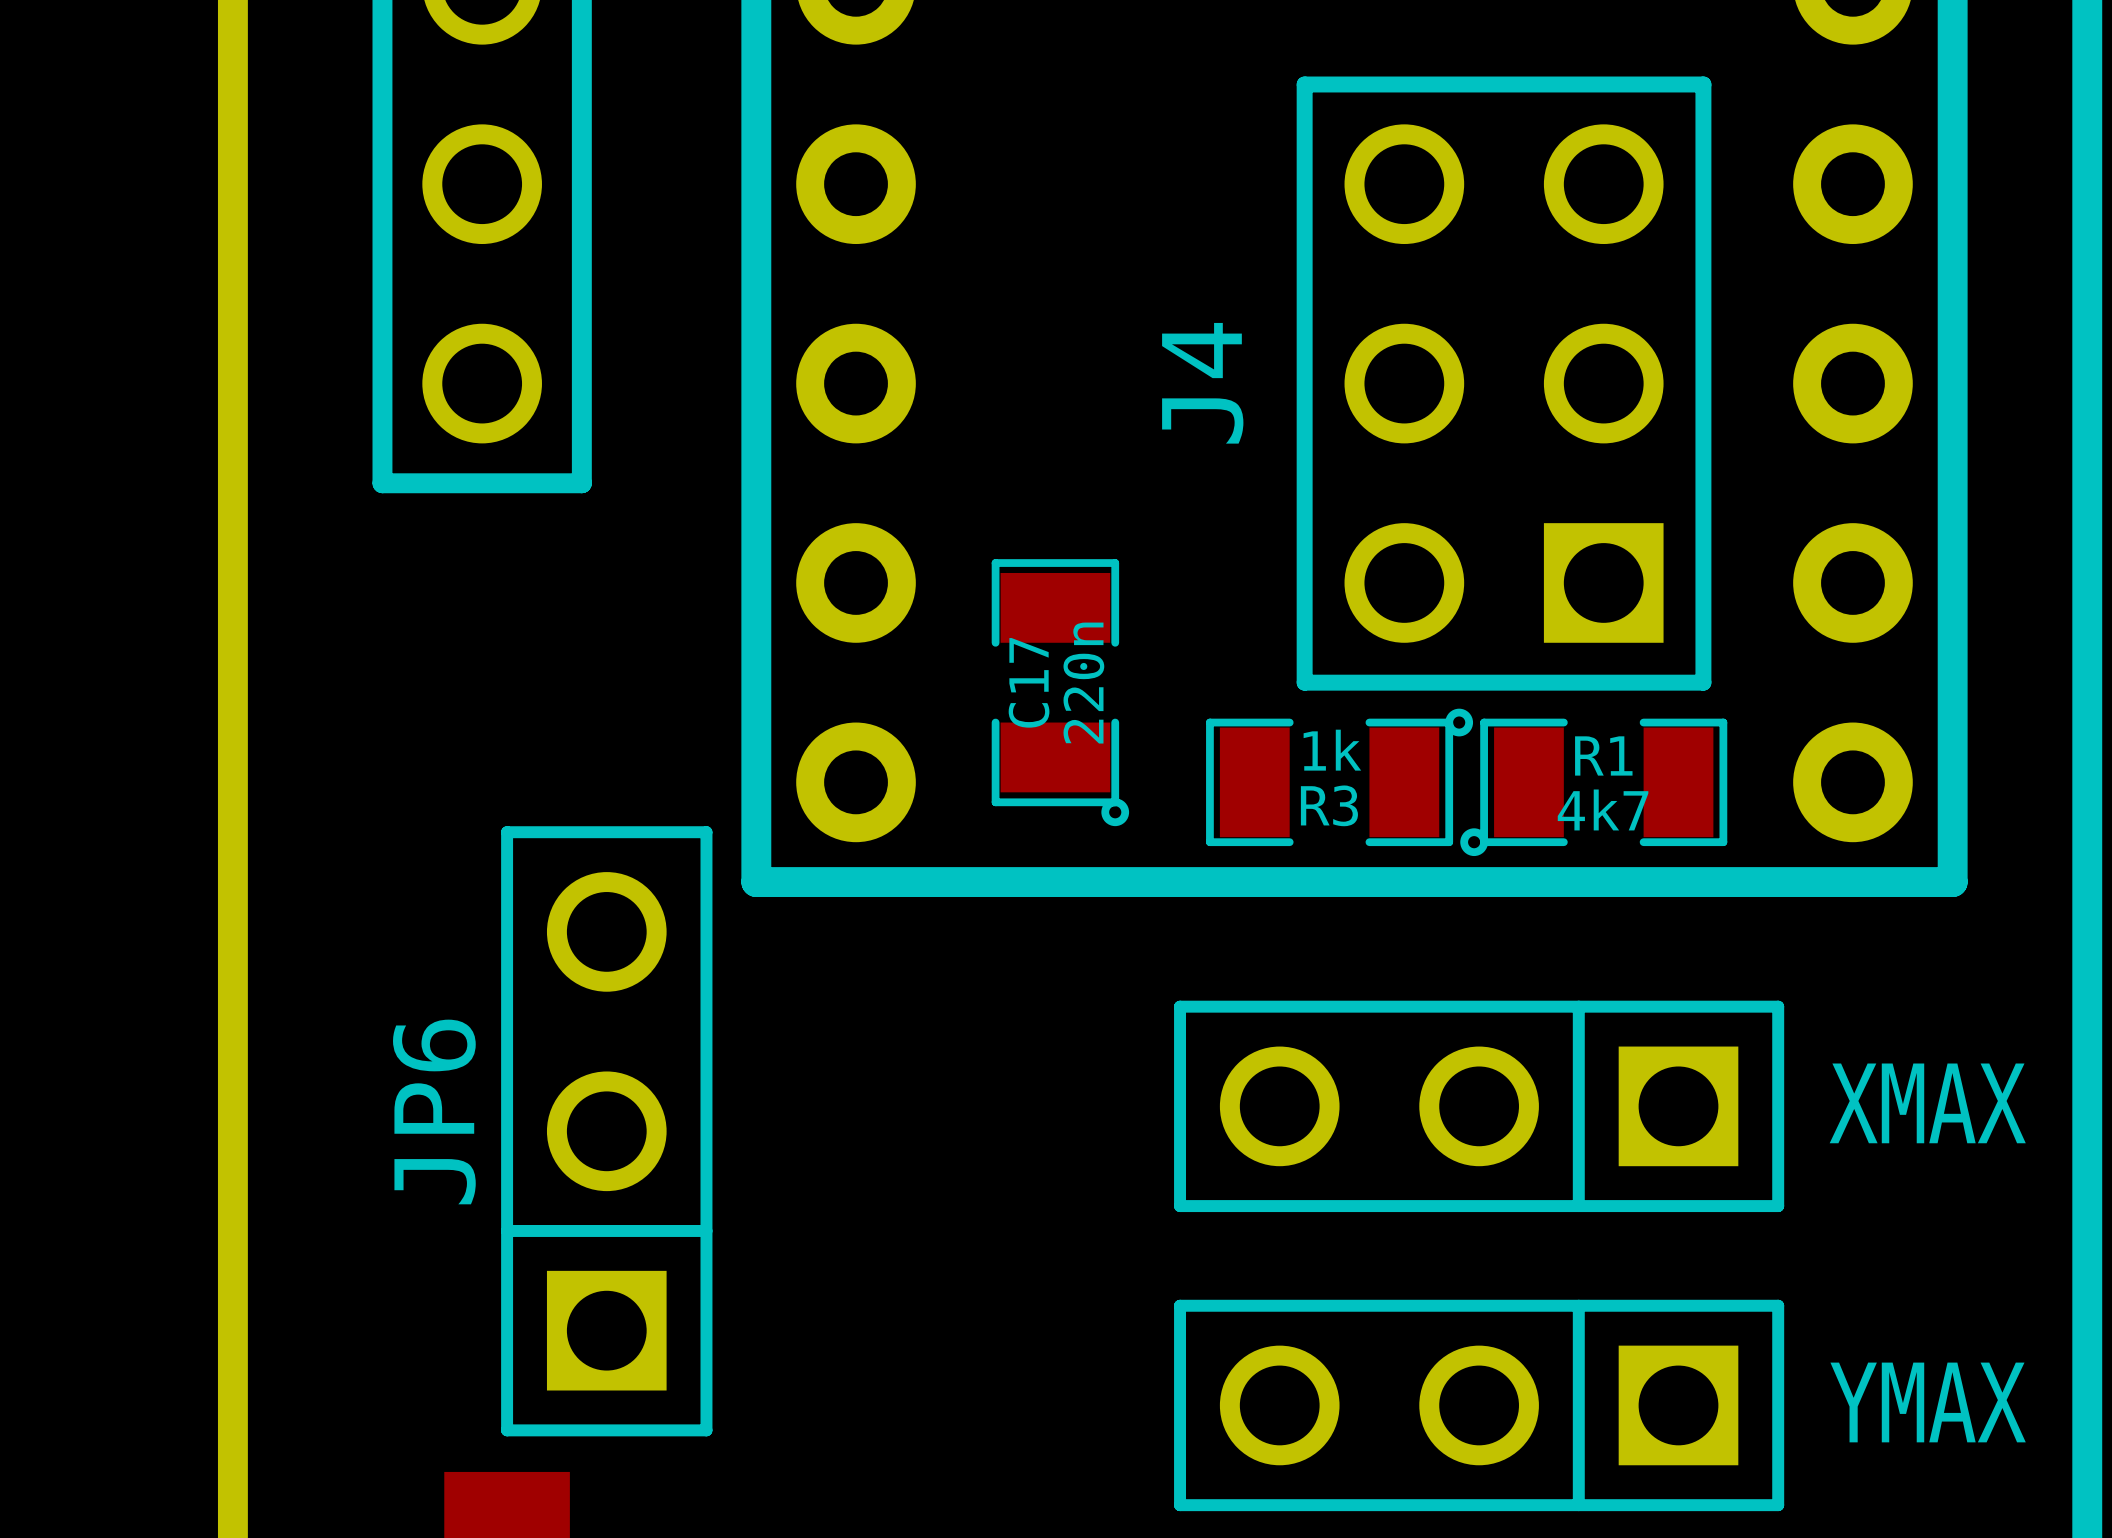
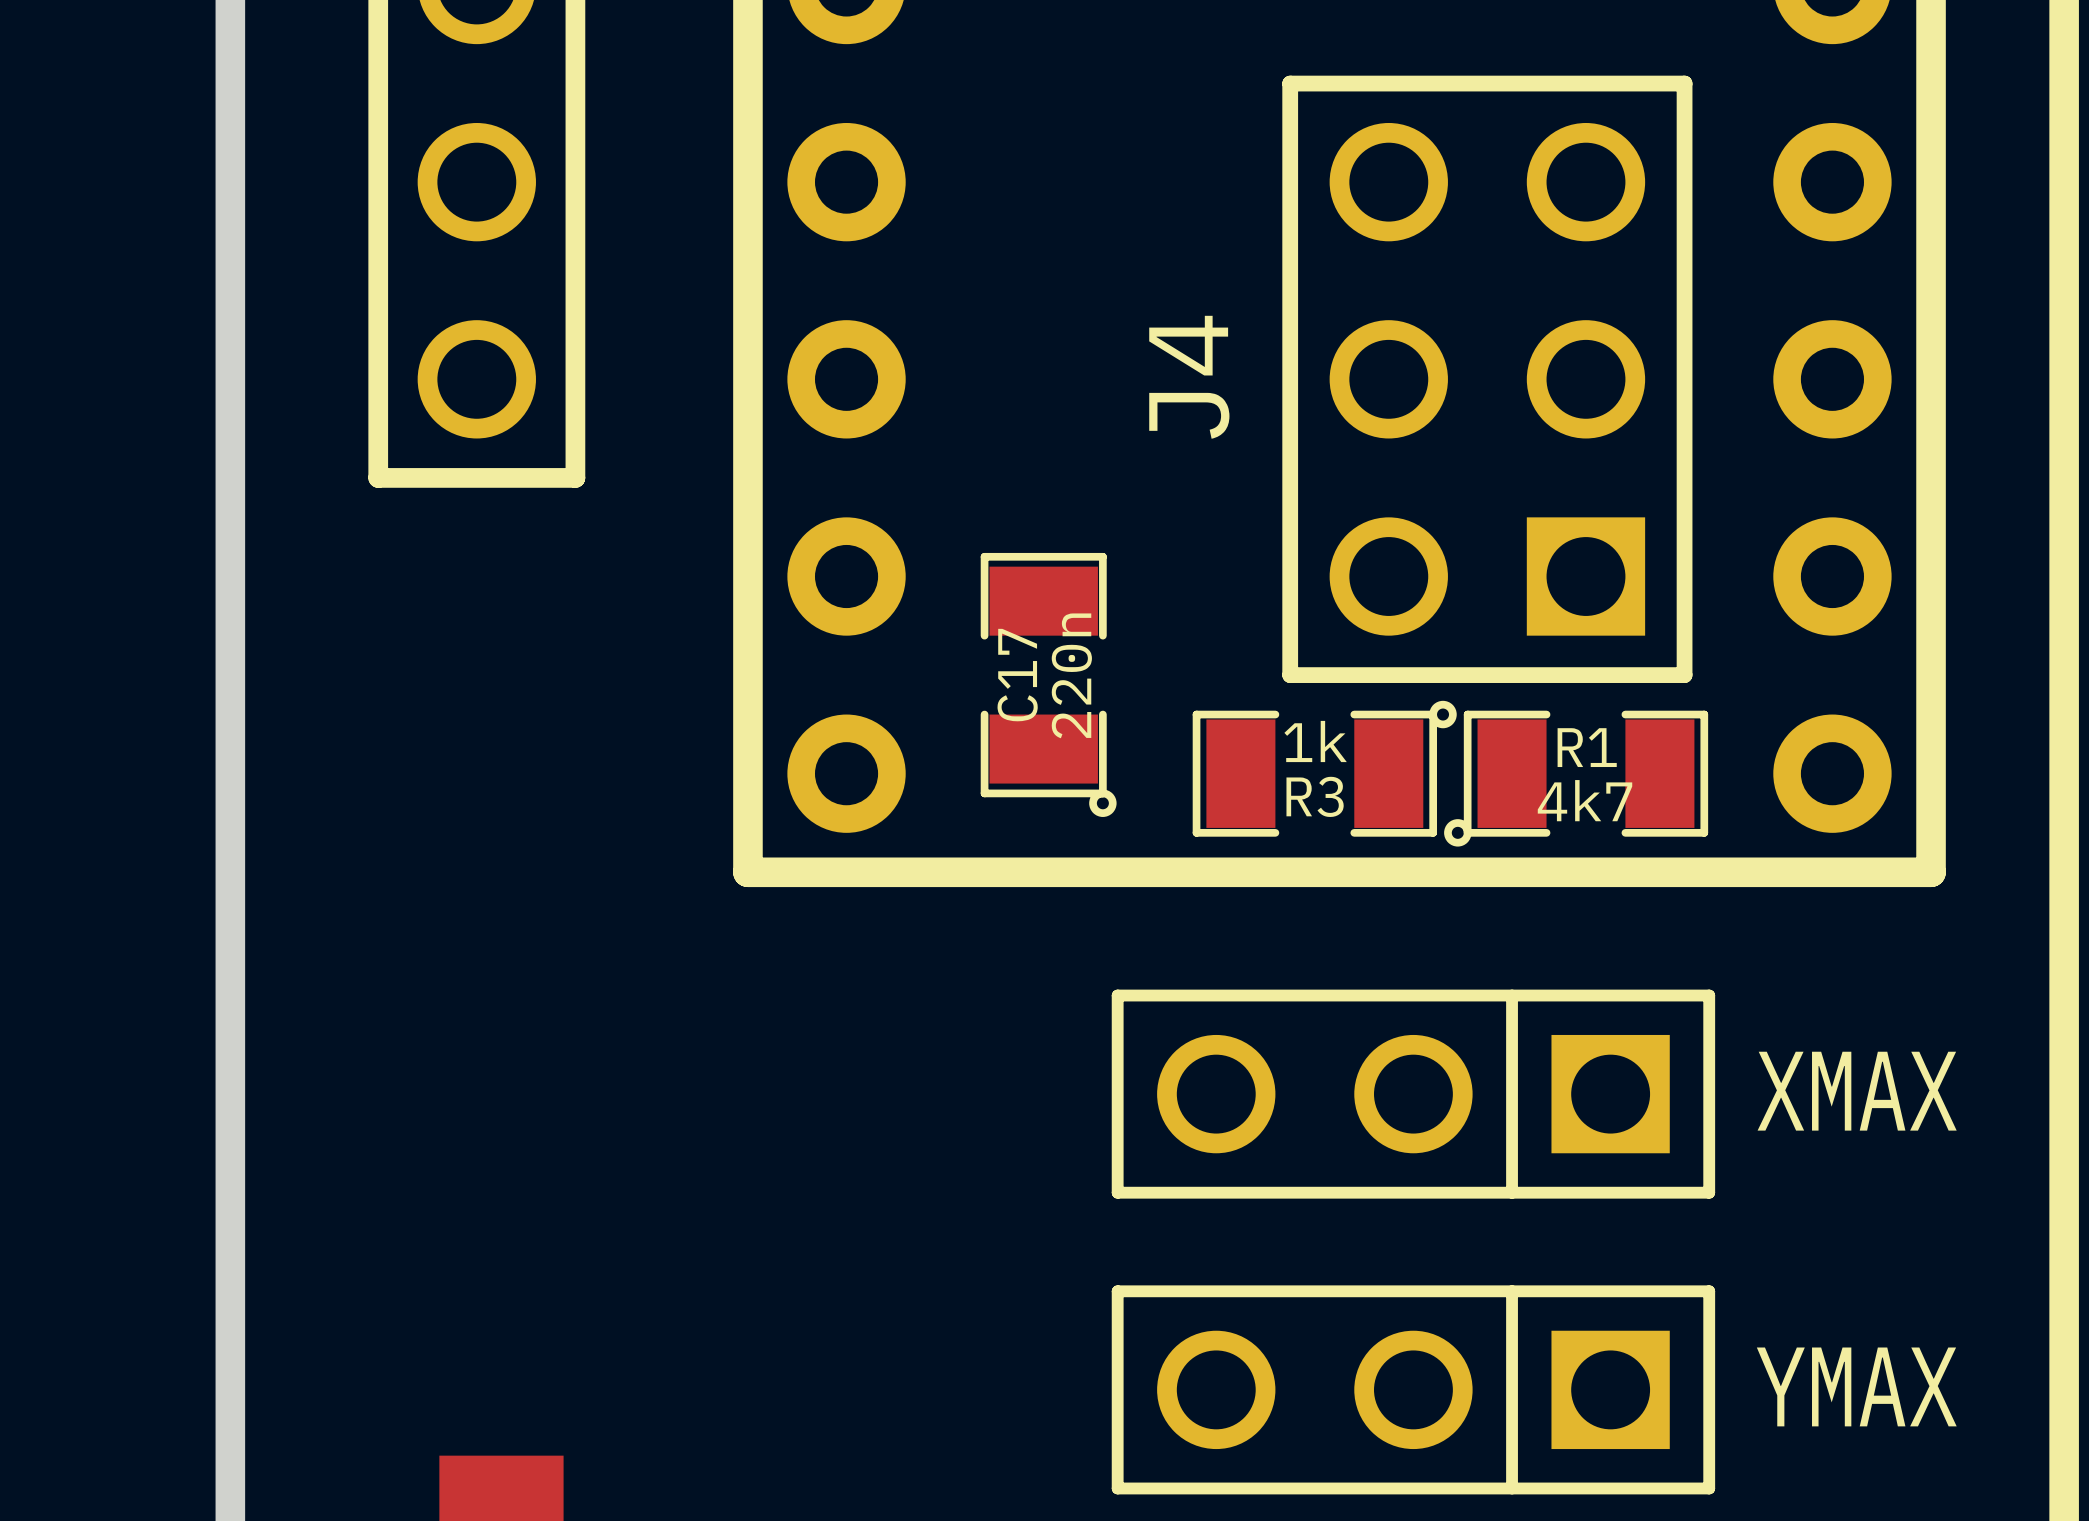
text position: XMAX (1927, 1103) -> XMAX (1857, 1091)
part position: (1479, 1106) -> (1413, 1094)
JP6: (606, 1131) -> none
text position: YMAX (1928, 1402) -> YMAX (1856, 1386)
part position: (1479, 1405) -> (1413, 1389)

